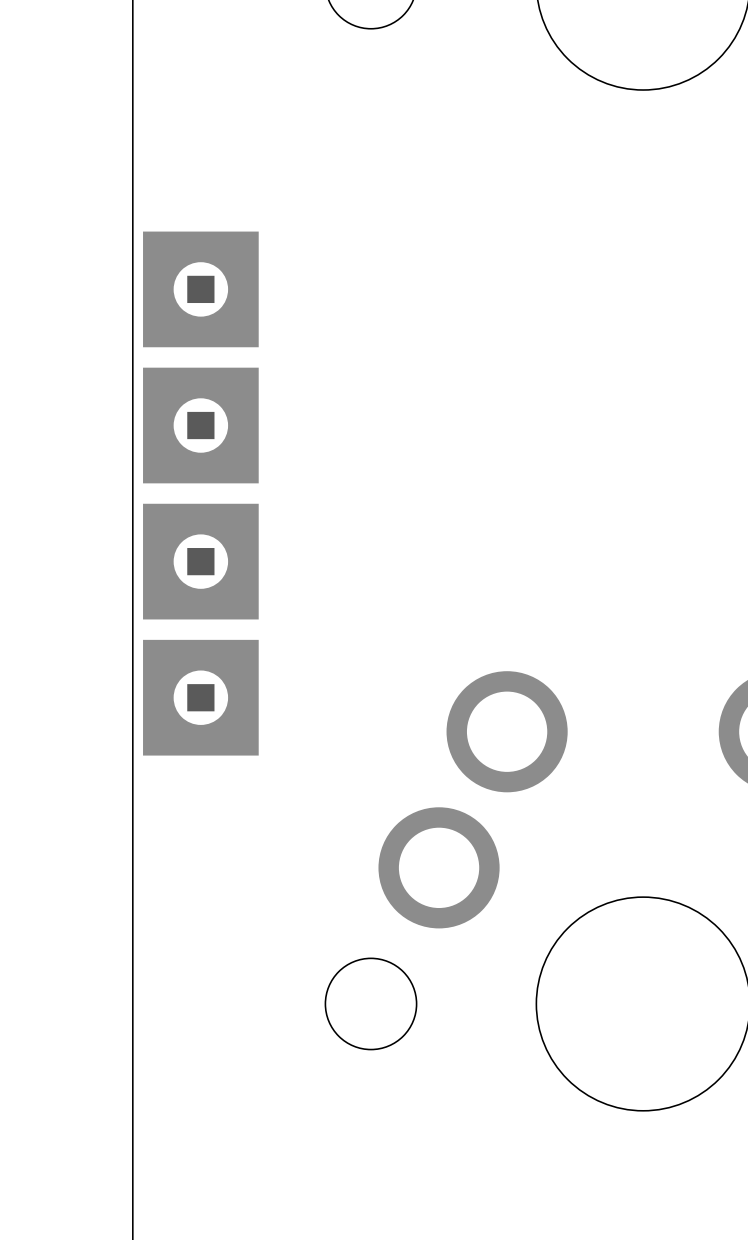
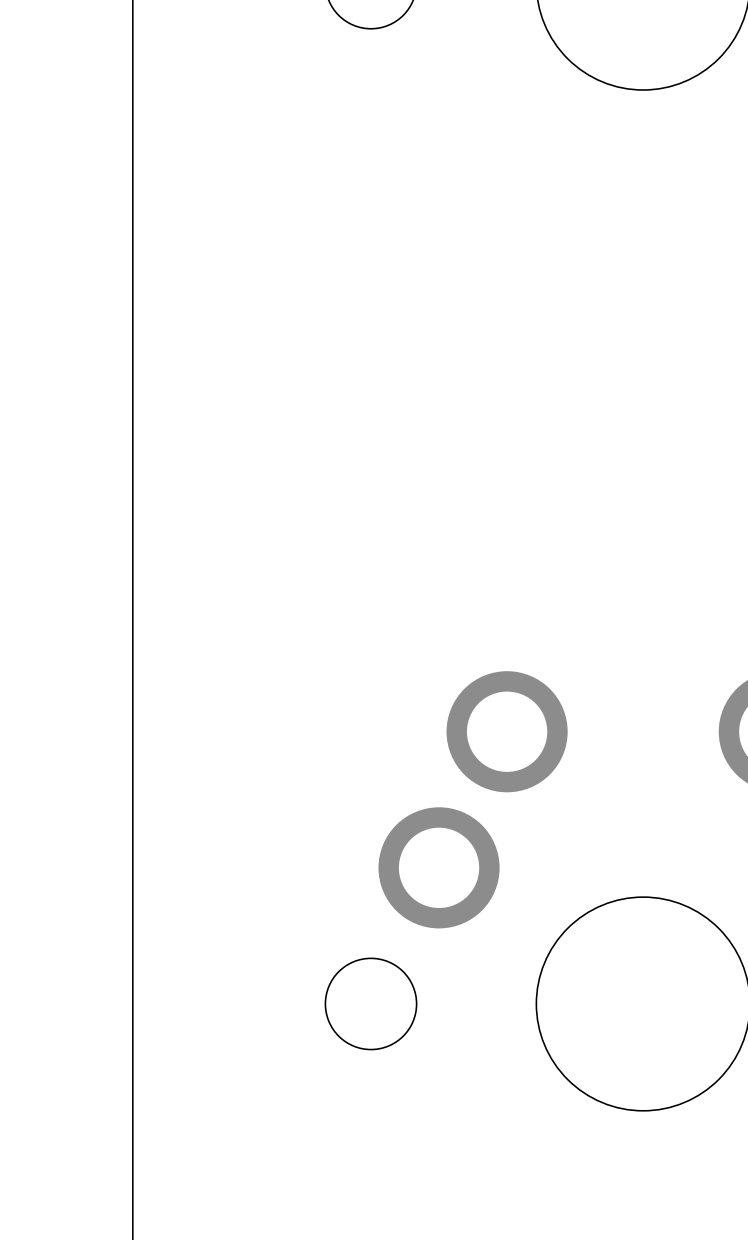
part: (200, 289) -> none
part: (200, 425) -> none
part: (200, 561) -> none
part: (200, 697) -> none

